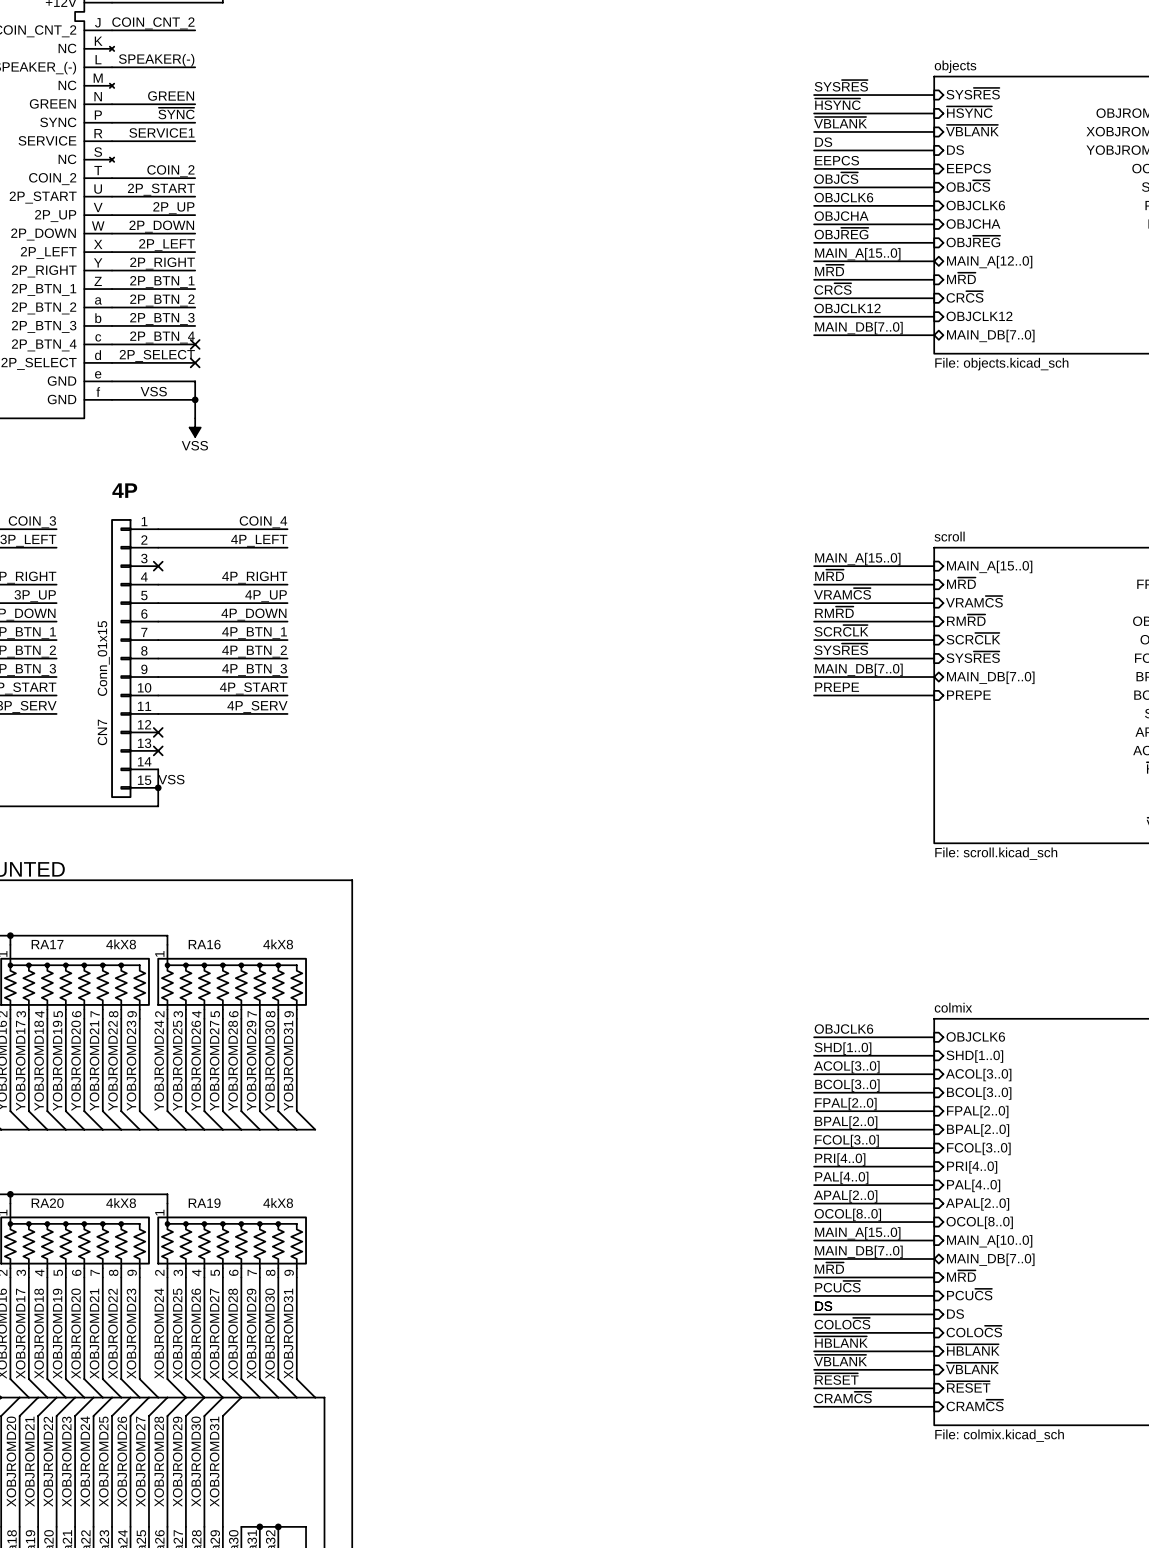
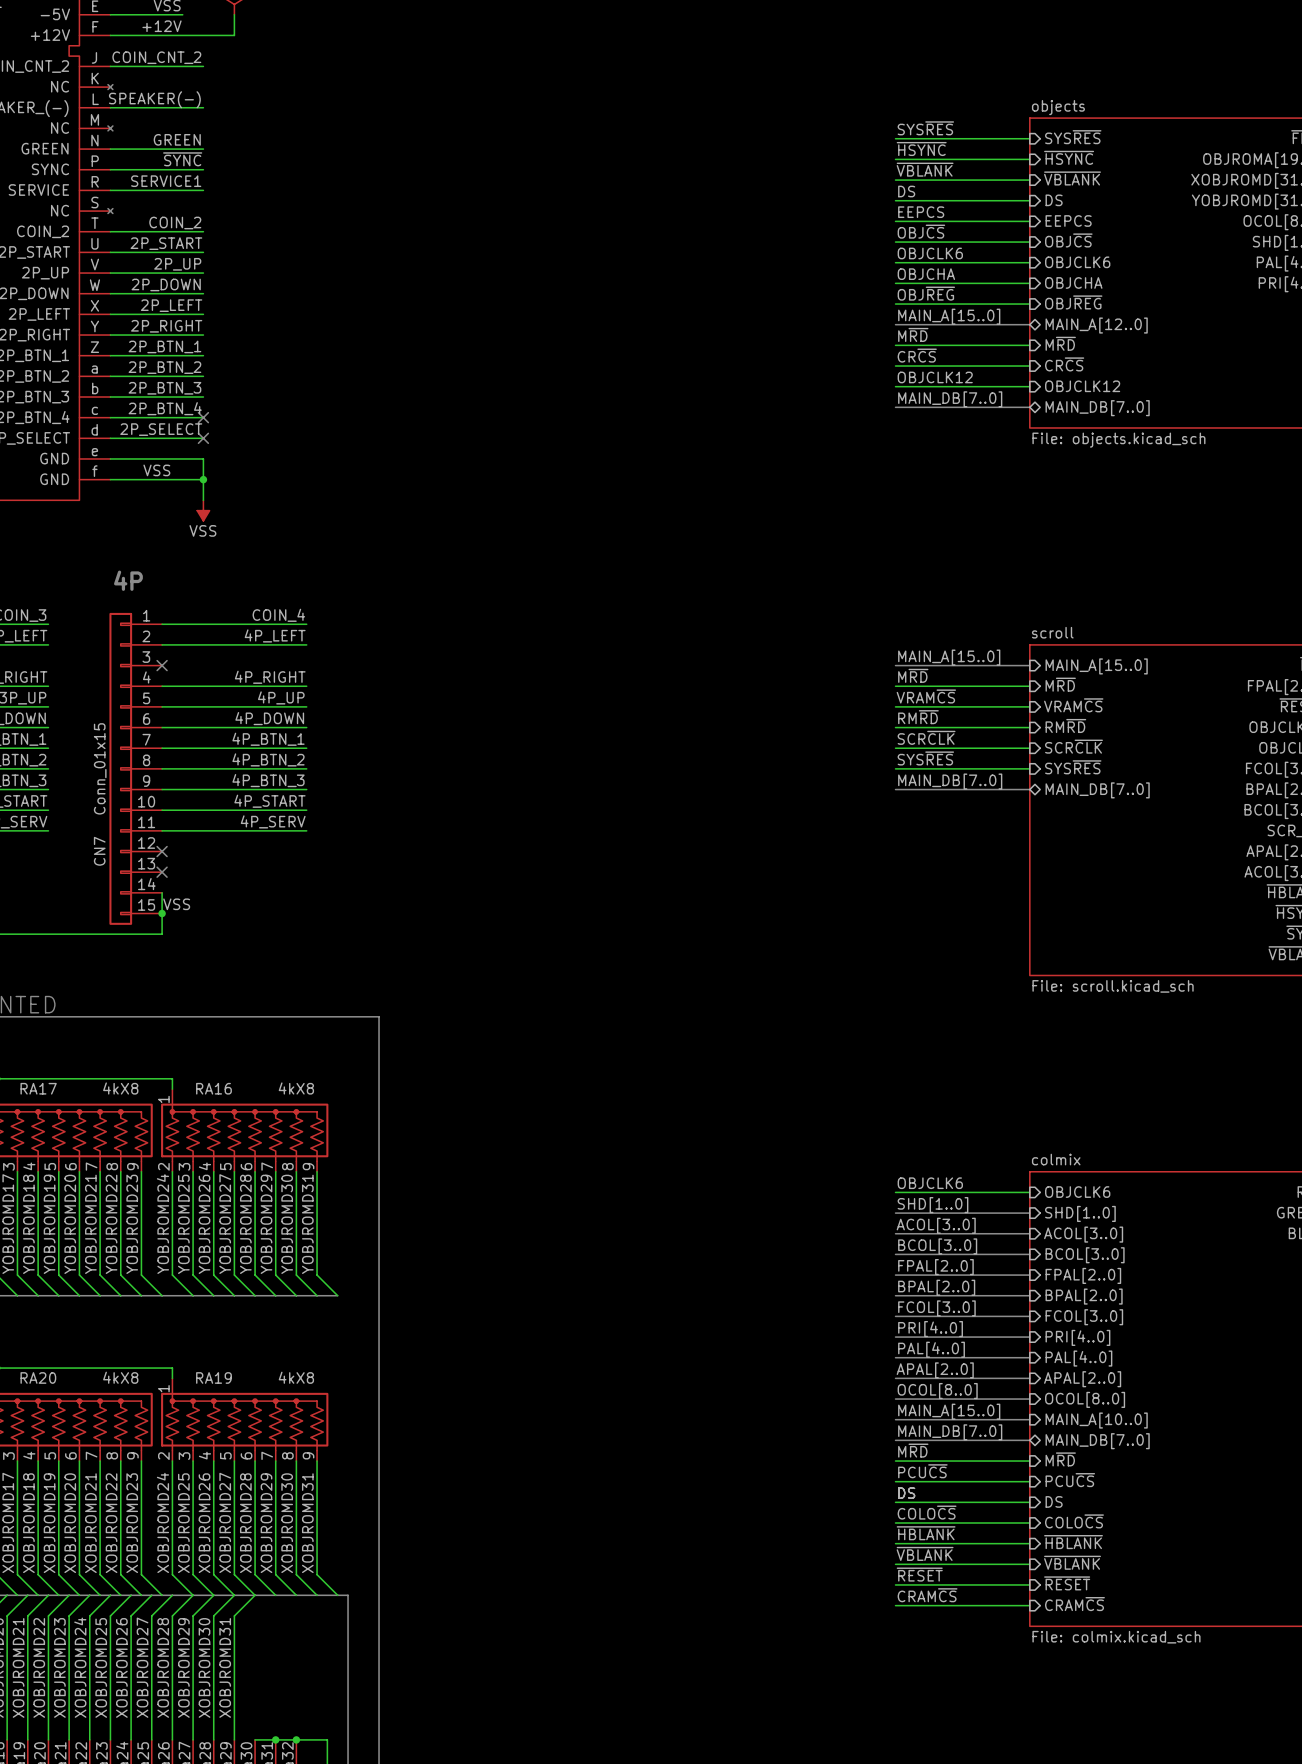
label: PREPE (837, 687) -> none
wire: (814, 695) (934, 695) -> none
sheet pin: PREPE (968, 695) -> none

